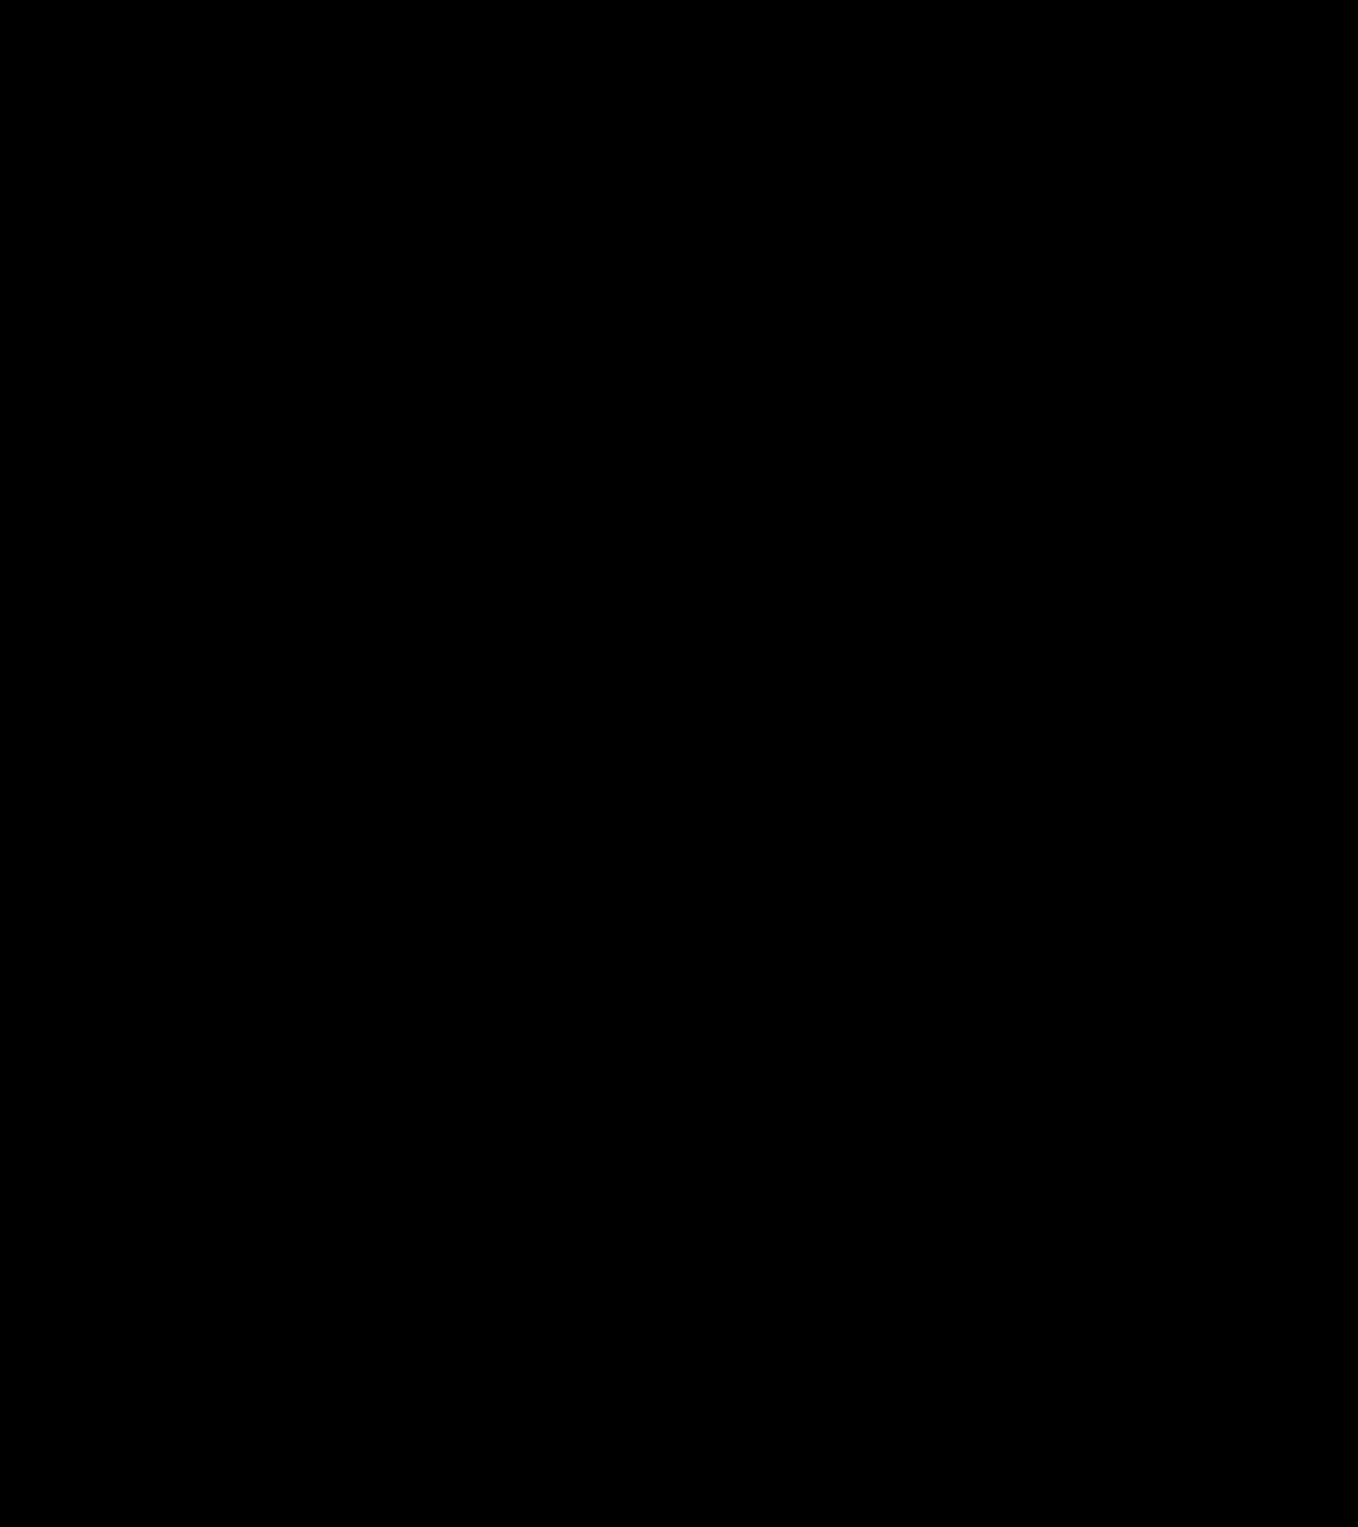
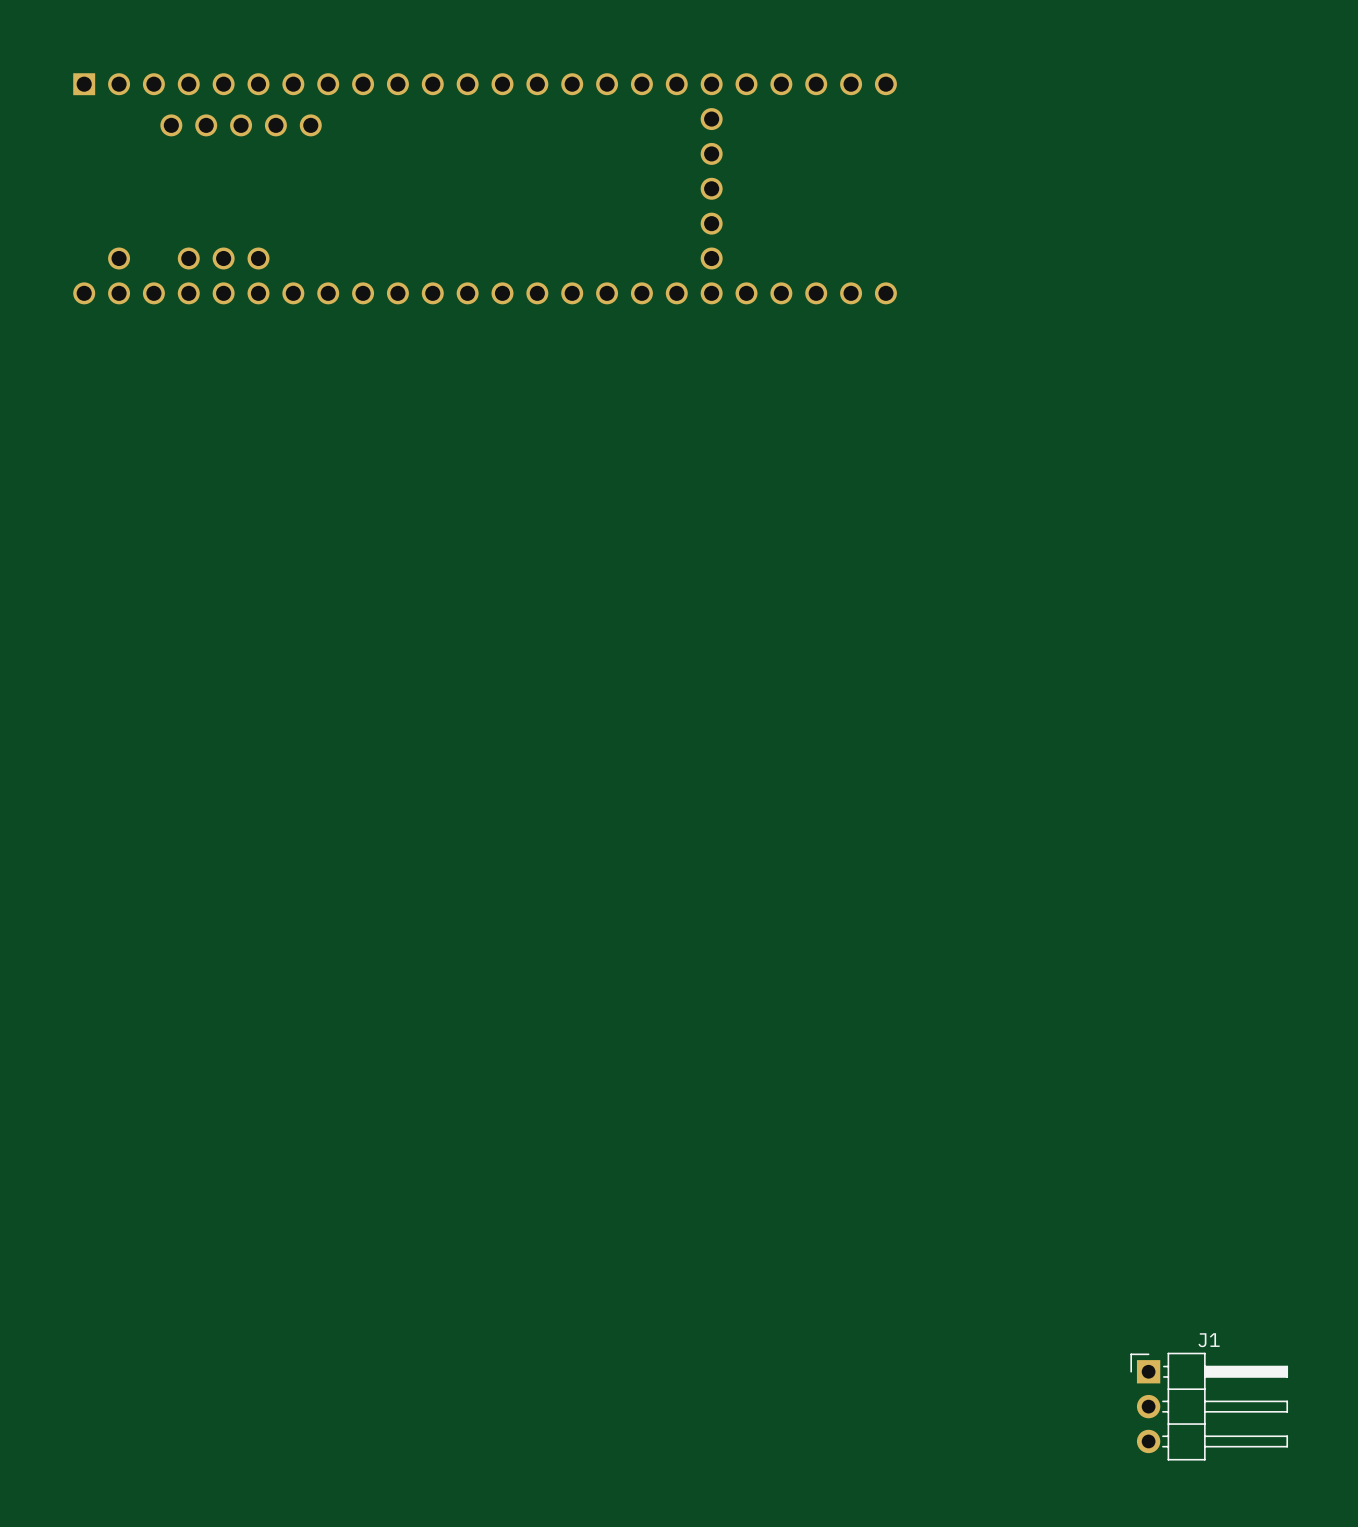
part: none -> (485, 188)
J1: none -> (1209, 1406)

